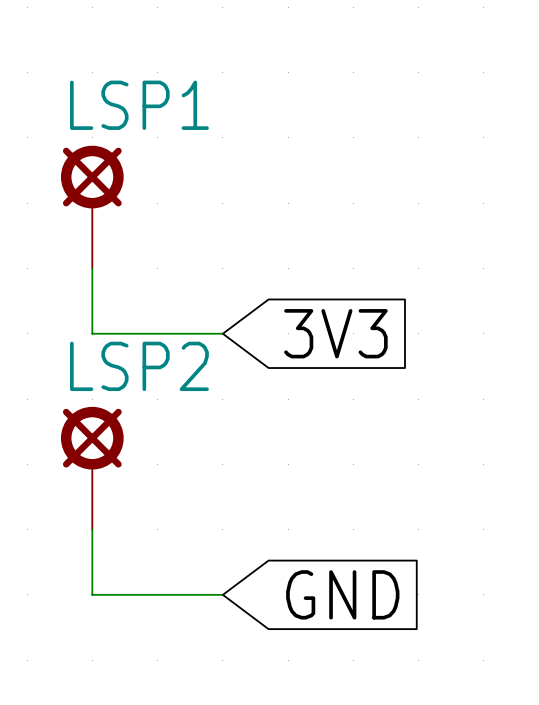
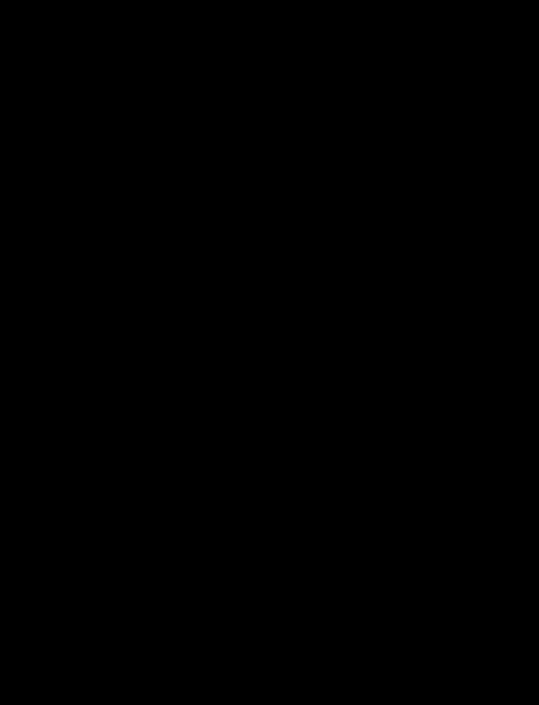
LSP1: (92, 207) -> none
wire: (92, 268) (92, 333) (222, 333) -> none
global label: 3V3 (335, 333) -> none
LSP2: (92, 468) -> none
wire: (92, 529) (92, 594) (222, 594) -> none
global label: GND (342, 594) -> none

